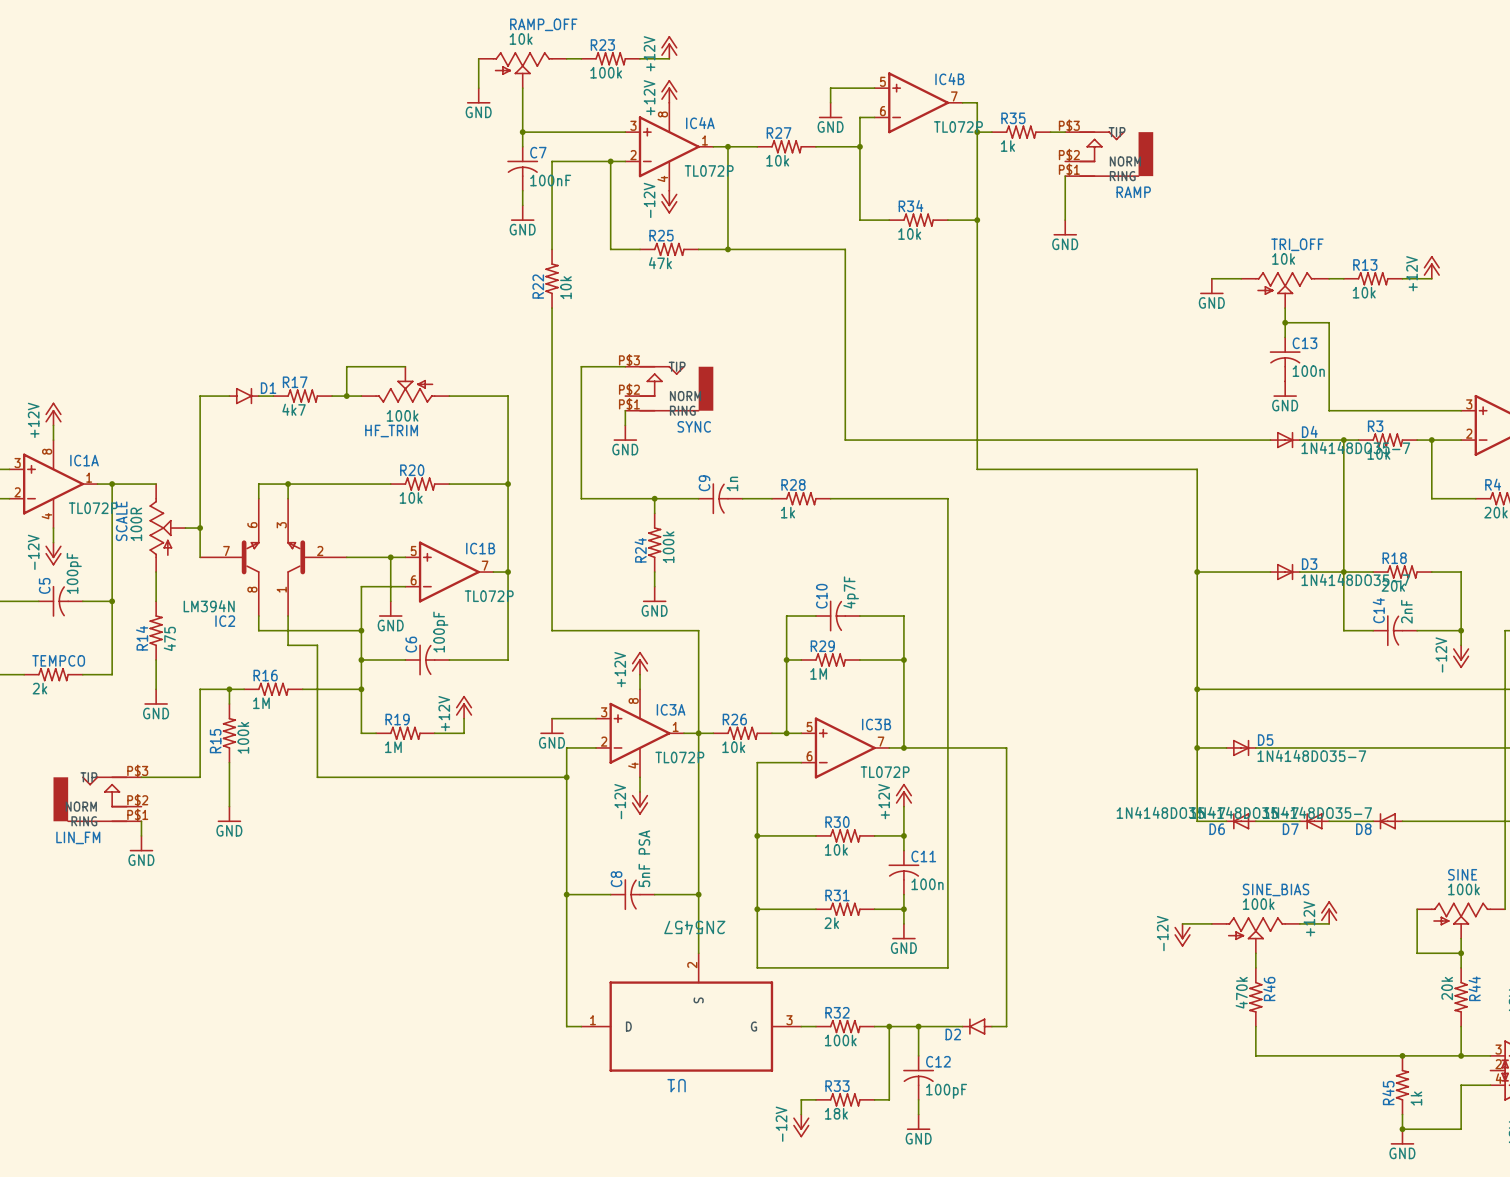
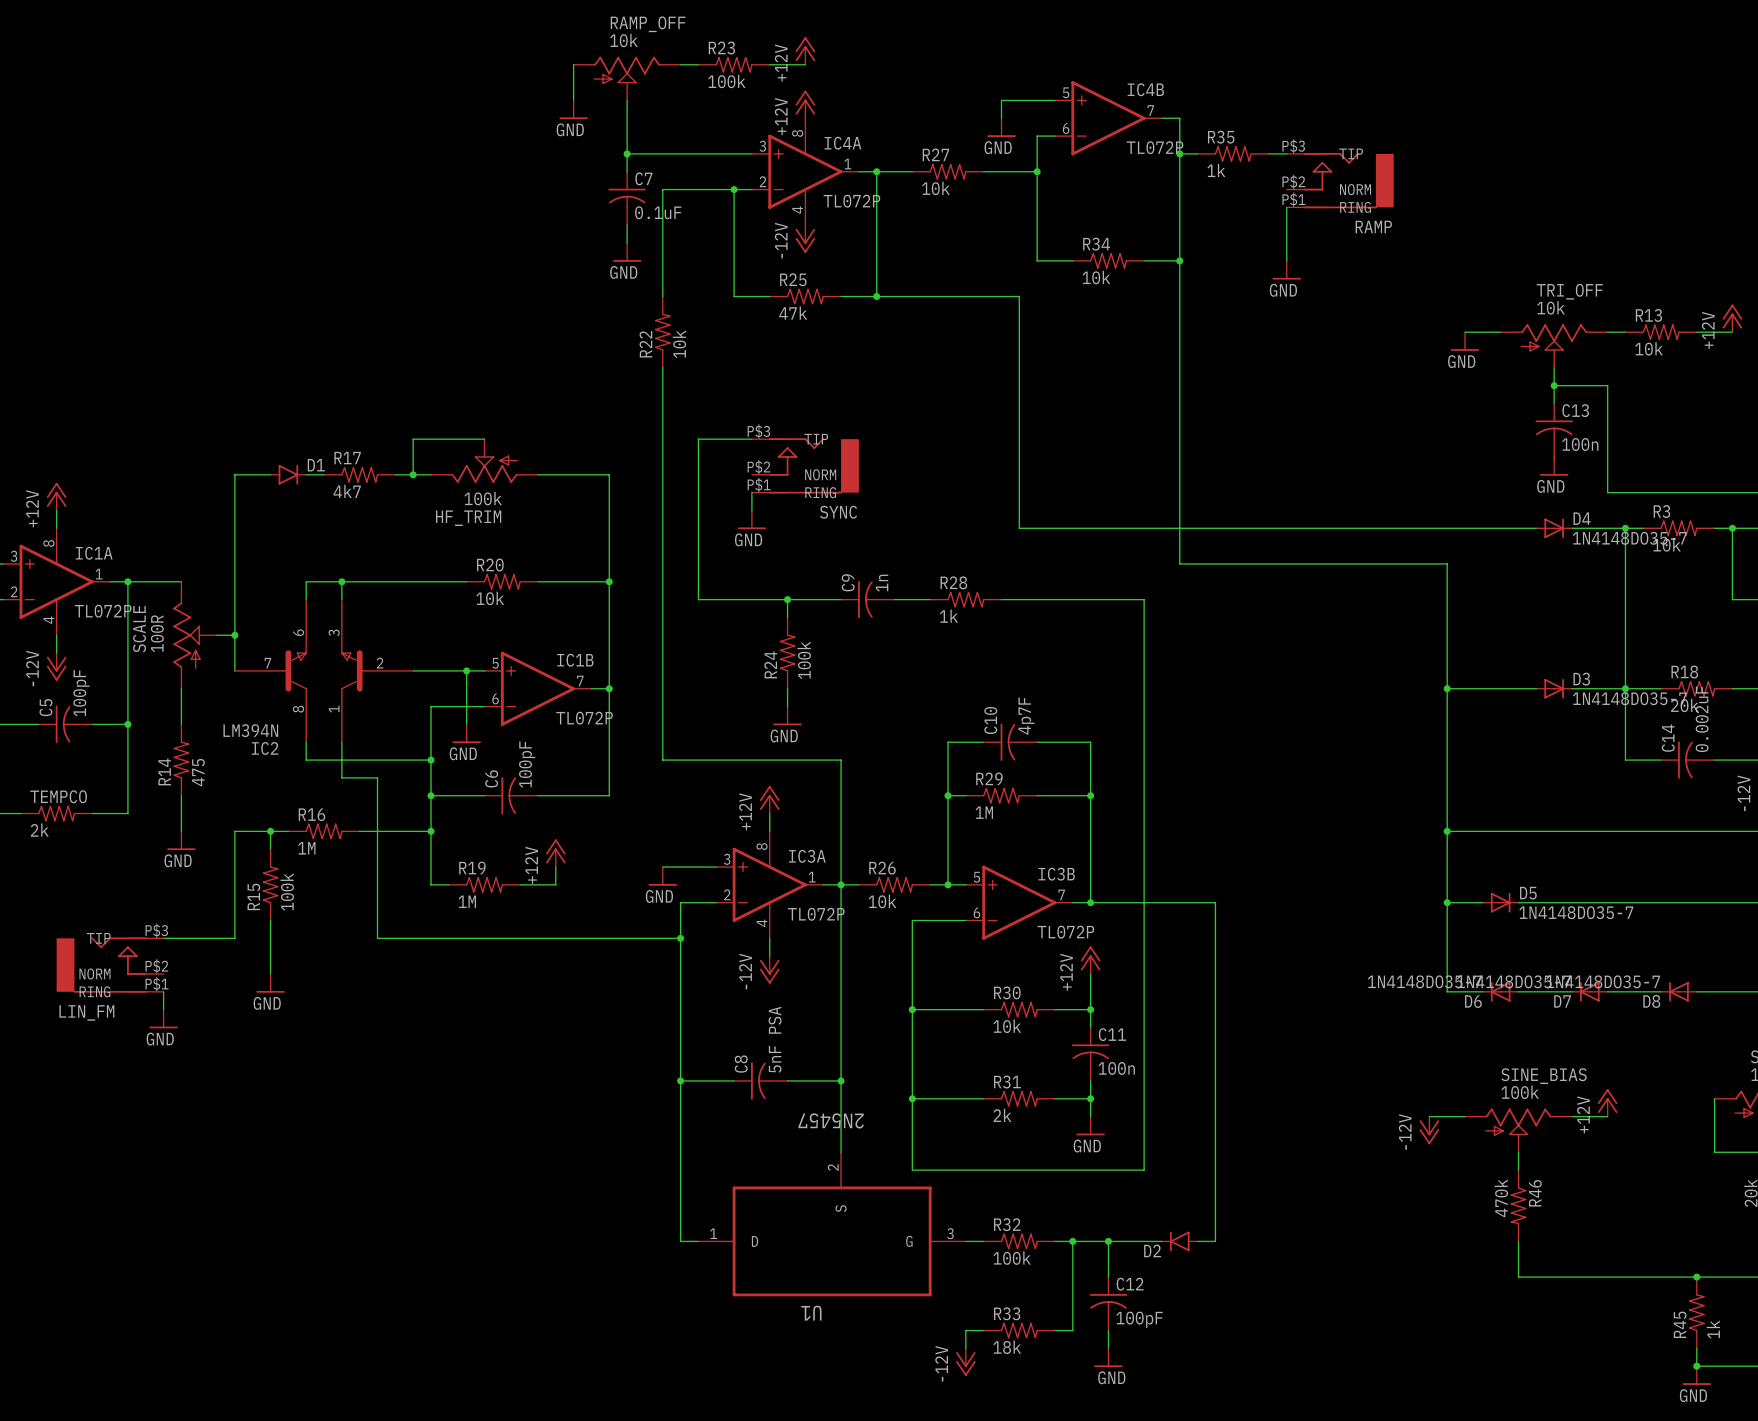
C7 value: 100nF (550, 180) -> 0.1uF (658, 212)
C14 value: 2nF (1406, 611) -> 0.002uF (1702, 719)

